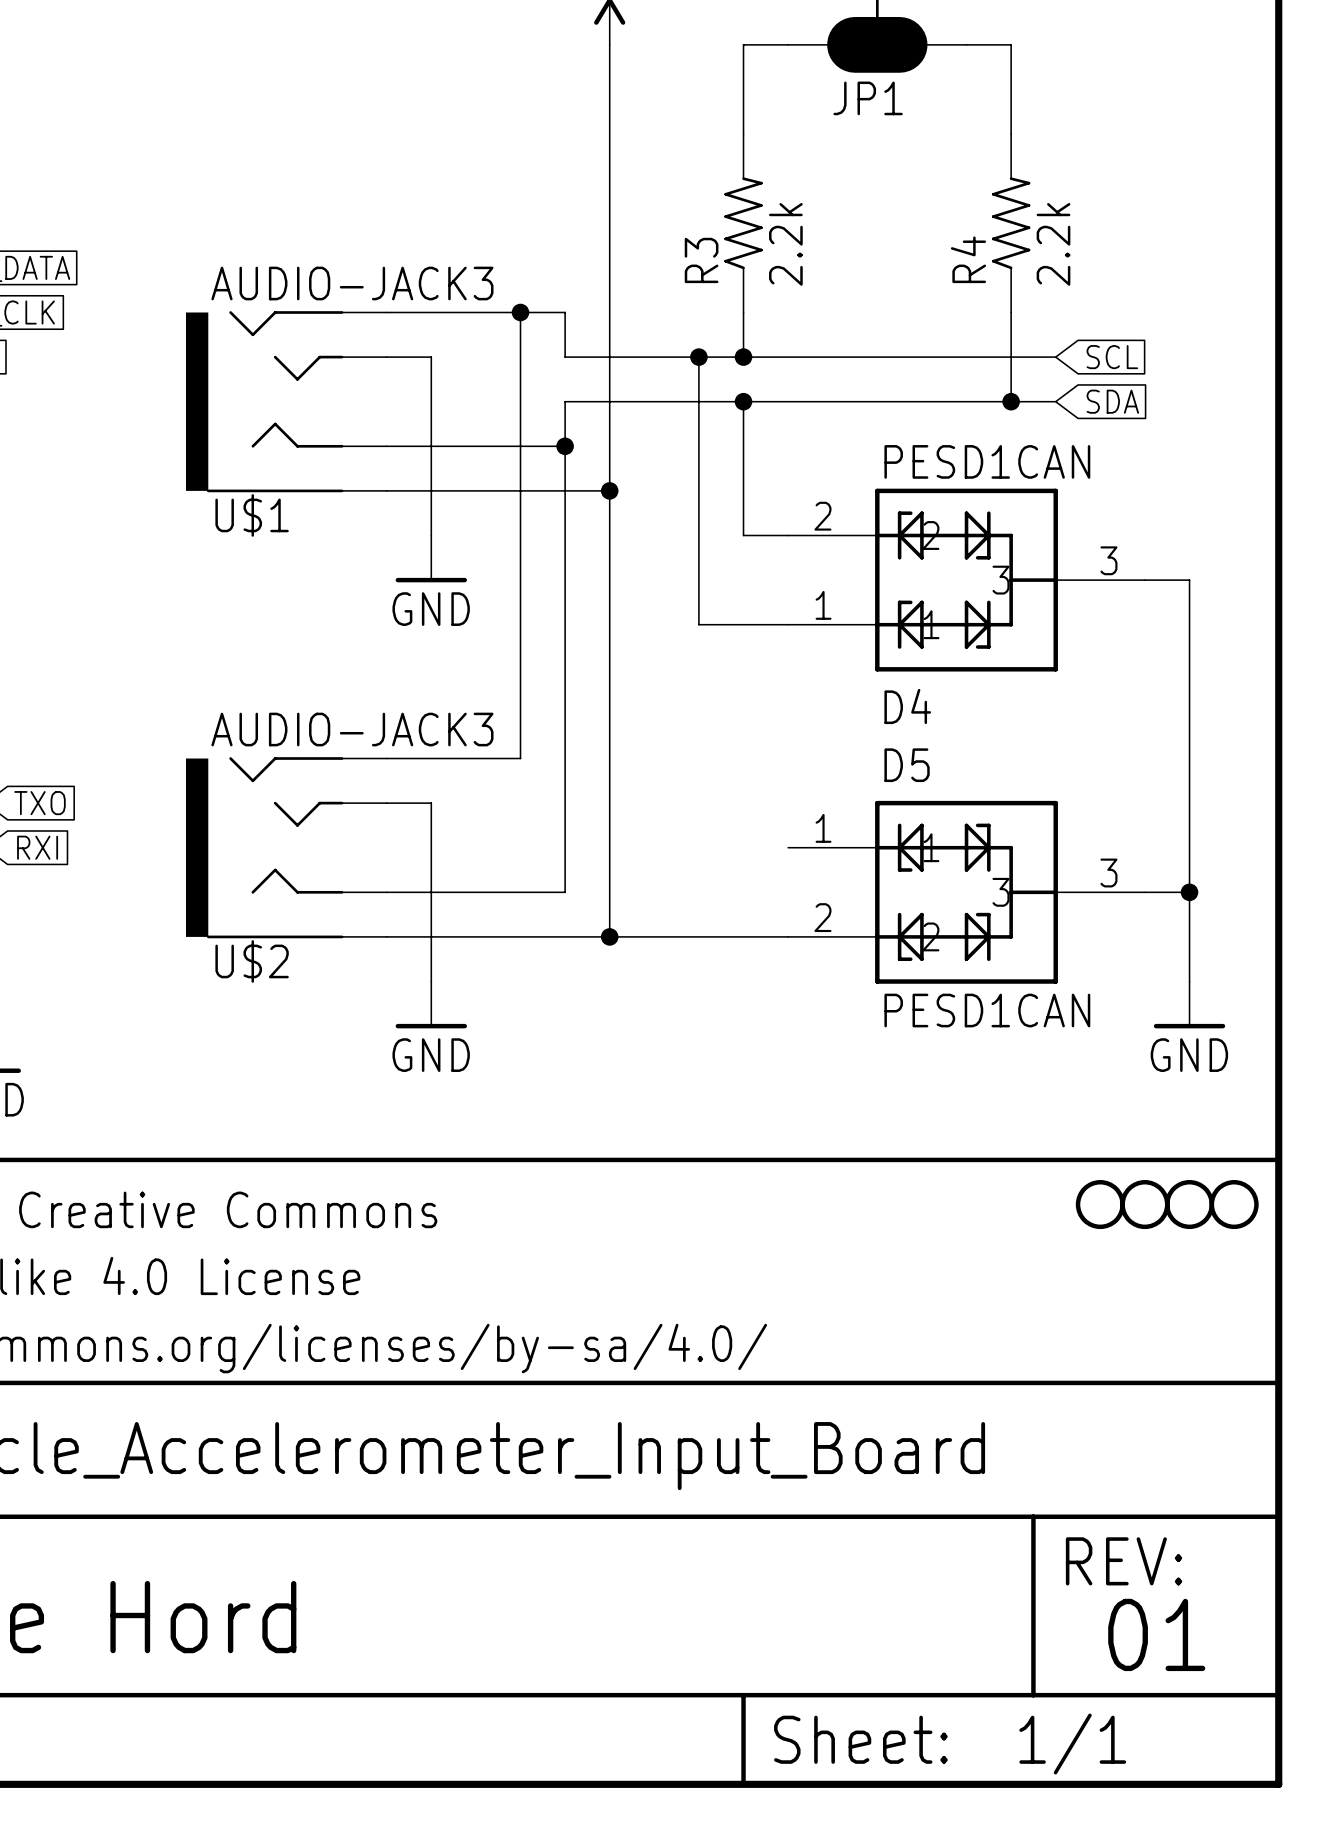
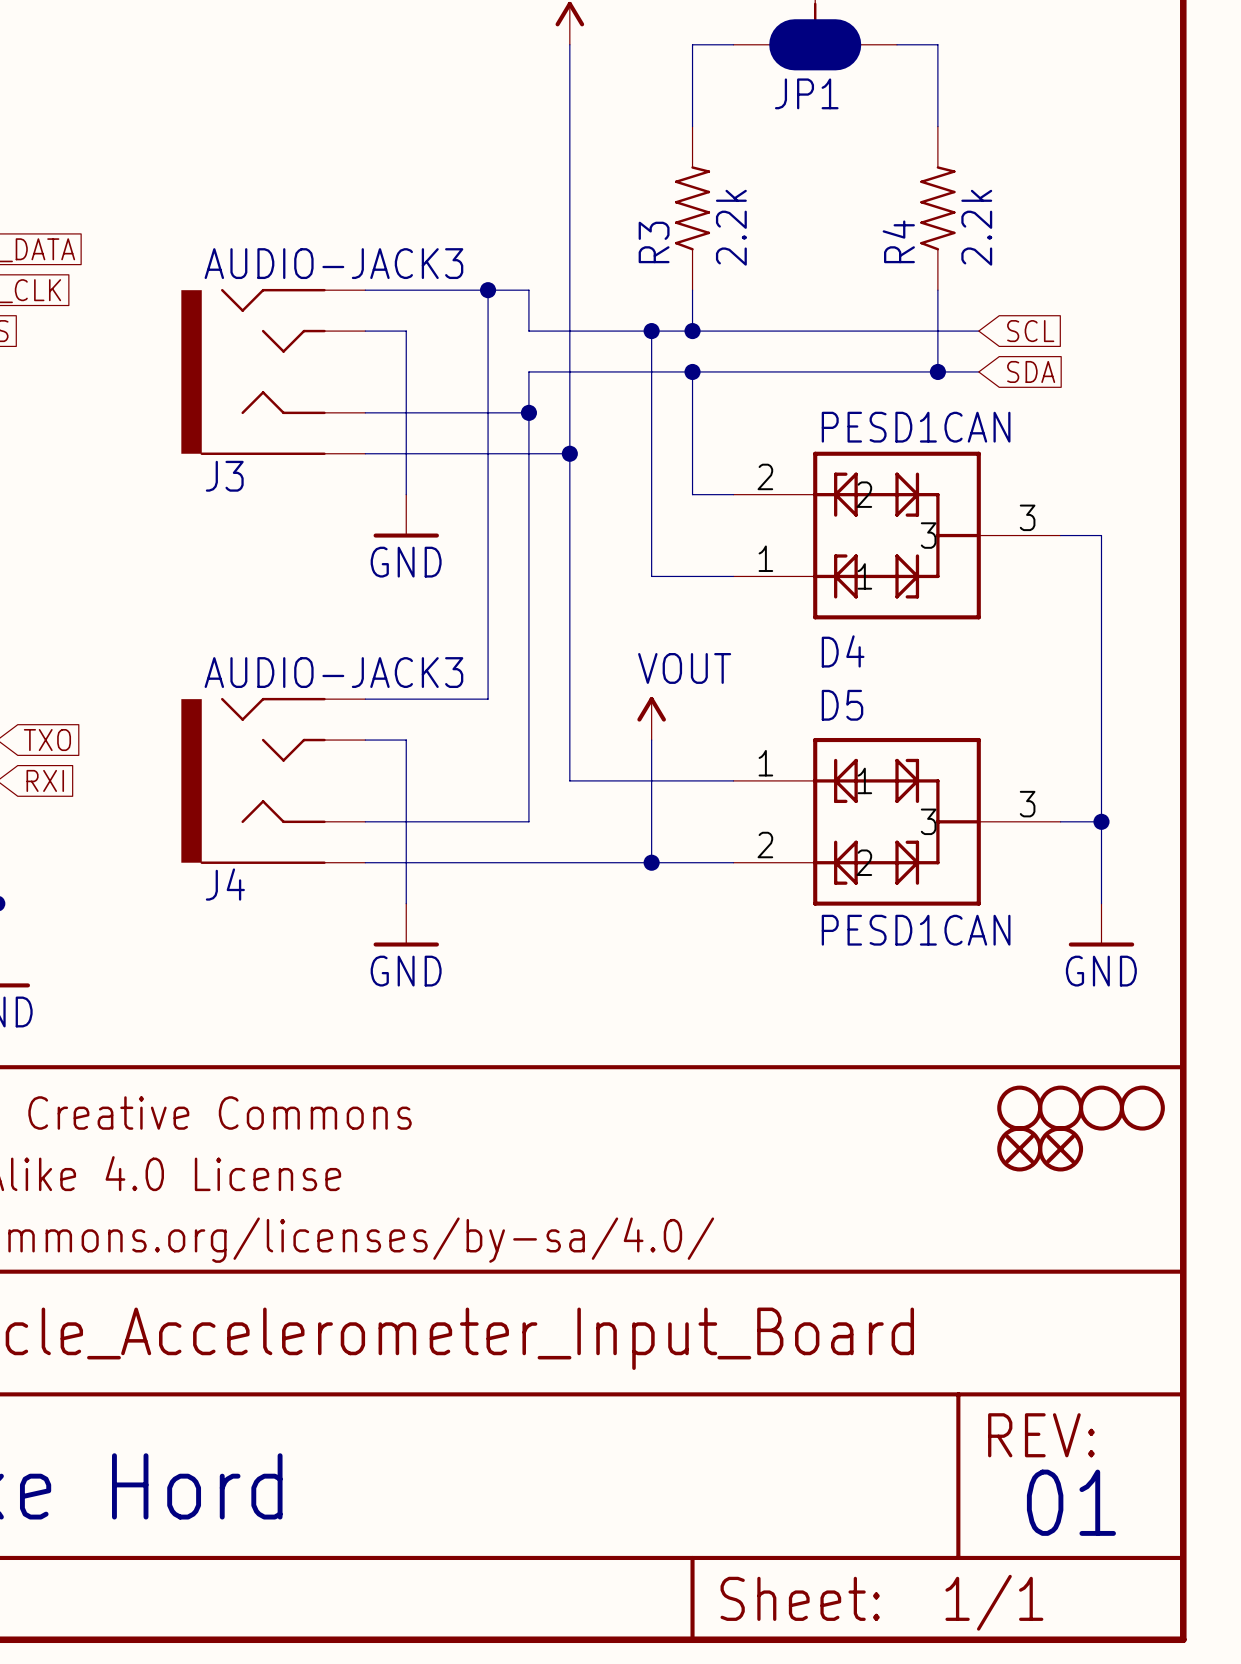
U$1 name: U$1 (252, 515) -> J3 (224, 476)
power symbol: none -> VOUT (651, 718)
wire: none -> (651, 740) (651, 862)
wire: (609, 847) (609, 936) -> (569, 780) (733, 780)
junction position: (609, 936) -> (651, 862)
U$2 name: U$2 (252, 961) -> J4 (225, 884)
part: none -> (1019, 1148)
part: none -> (1060, 1148)

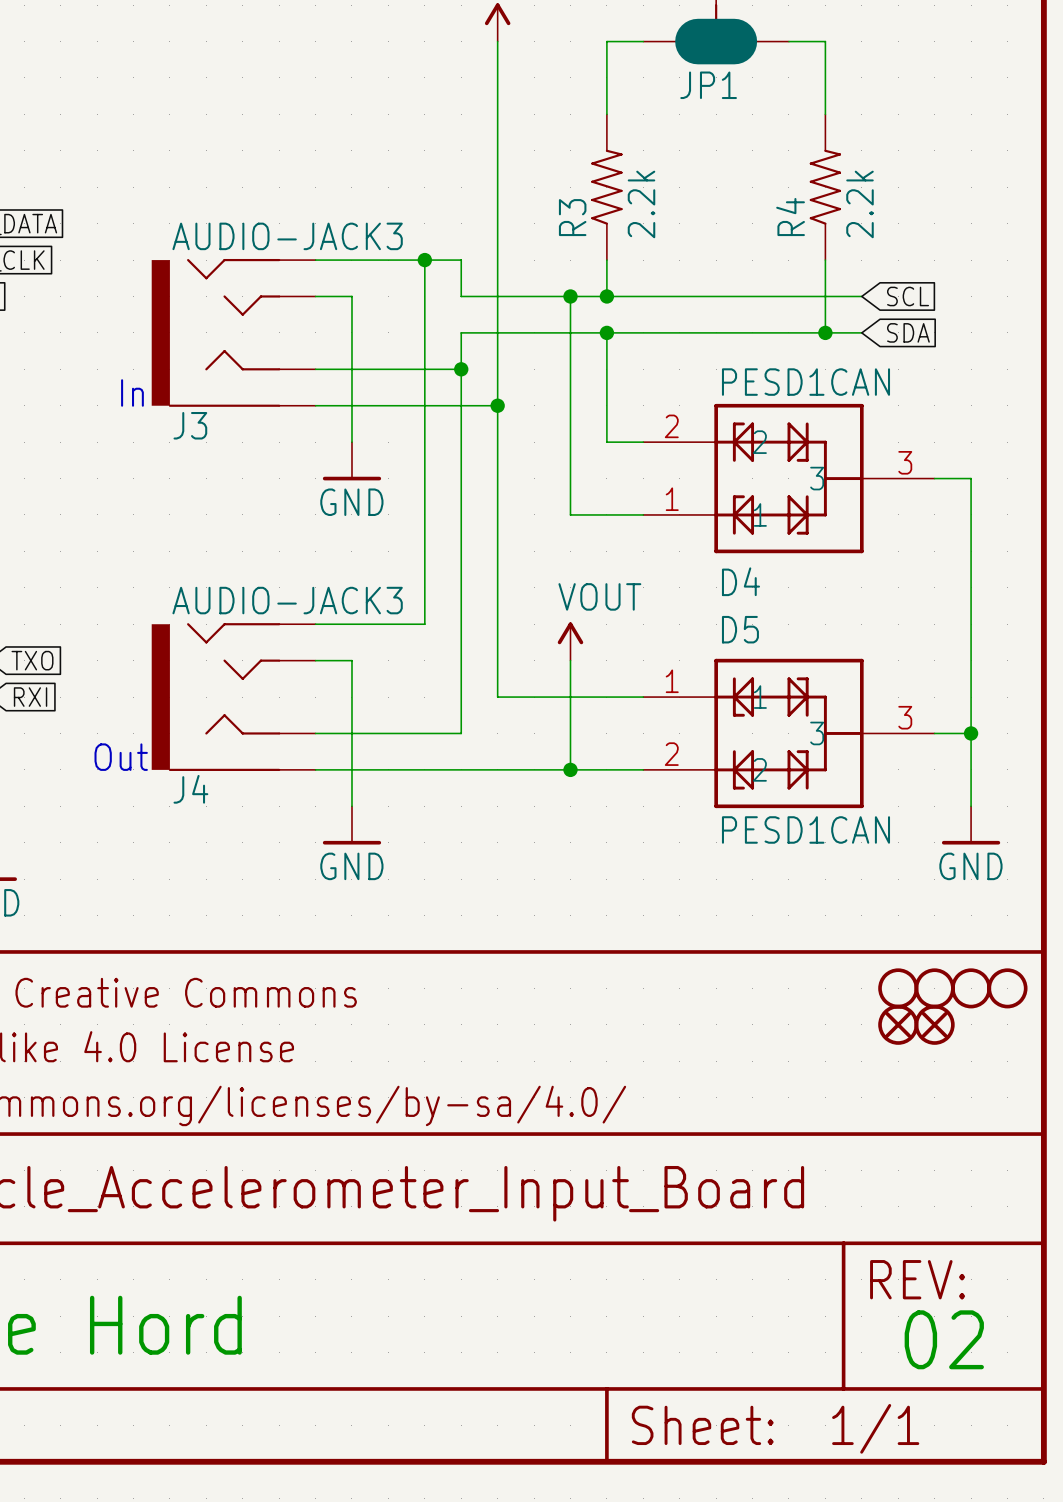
text: none -> In (132, 392)
text: none -> Out (121, 757)
text: 01 (1071, 1502) -> 02 (944, 1339)

